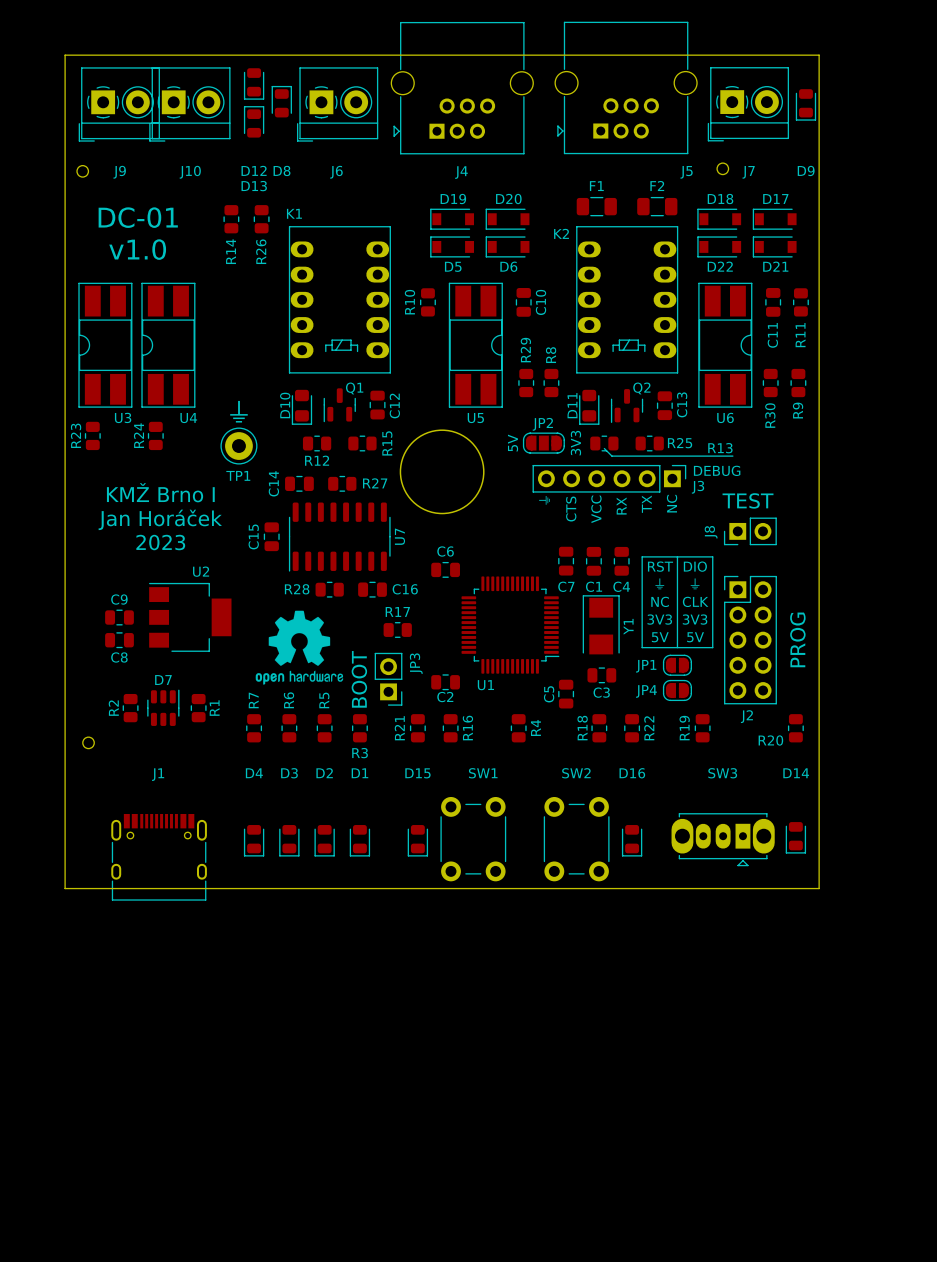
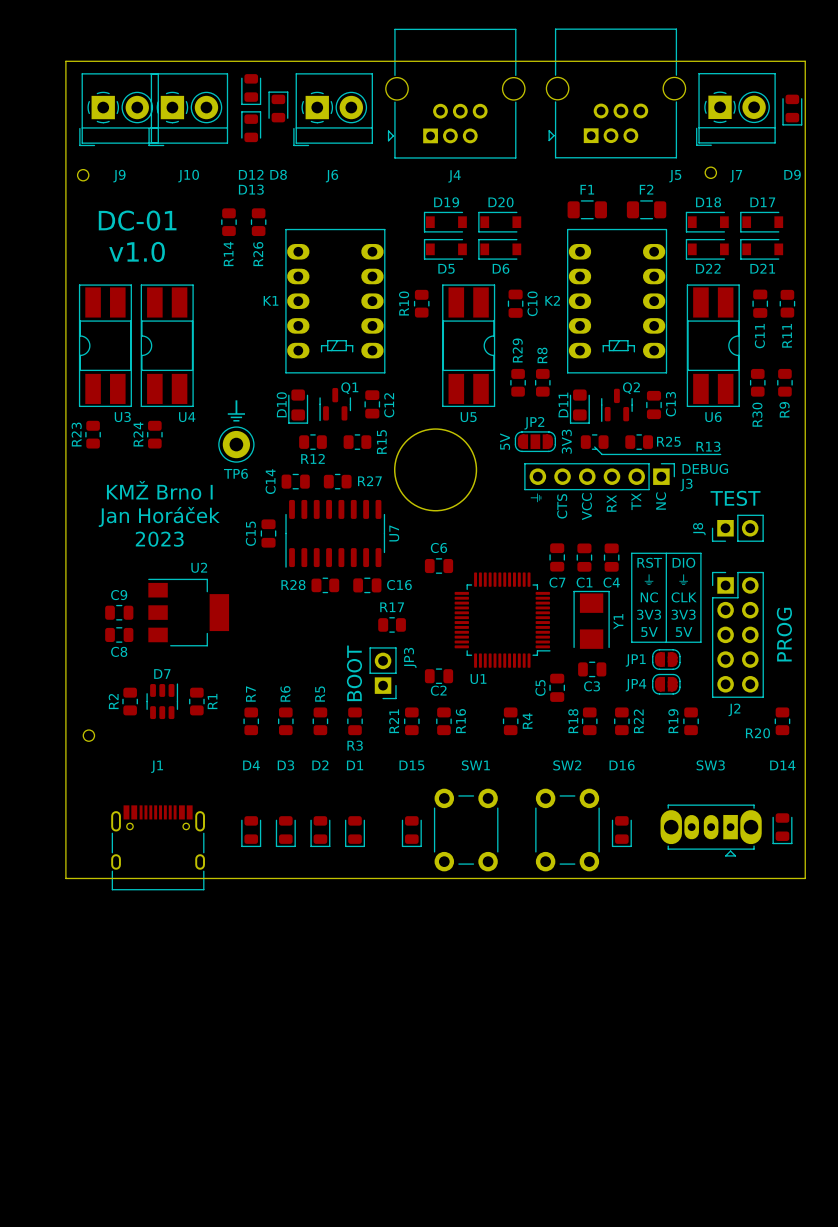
K1 name position: K1 (294, 213) -> K1 (271, 300)
K2 name position: K2 (561, 233) -> K2 (552, 300)
TP1 name: TP1 (238, 475) -> TP6 (235, 473)
drawing: [255, 610, 344, 685] -> none

